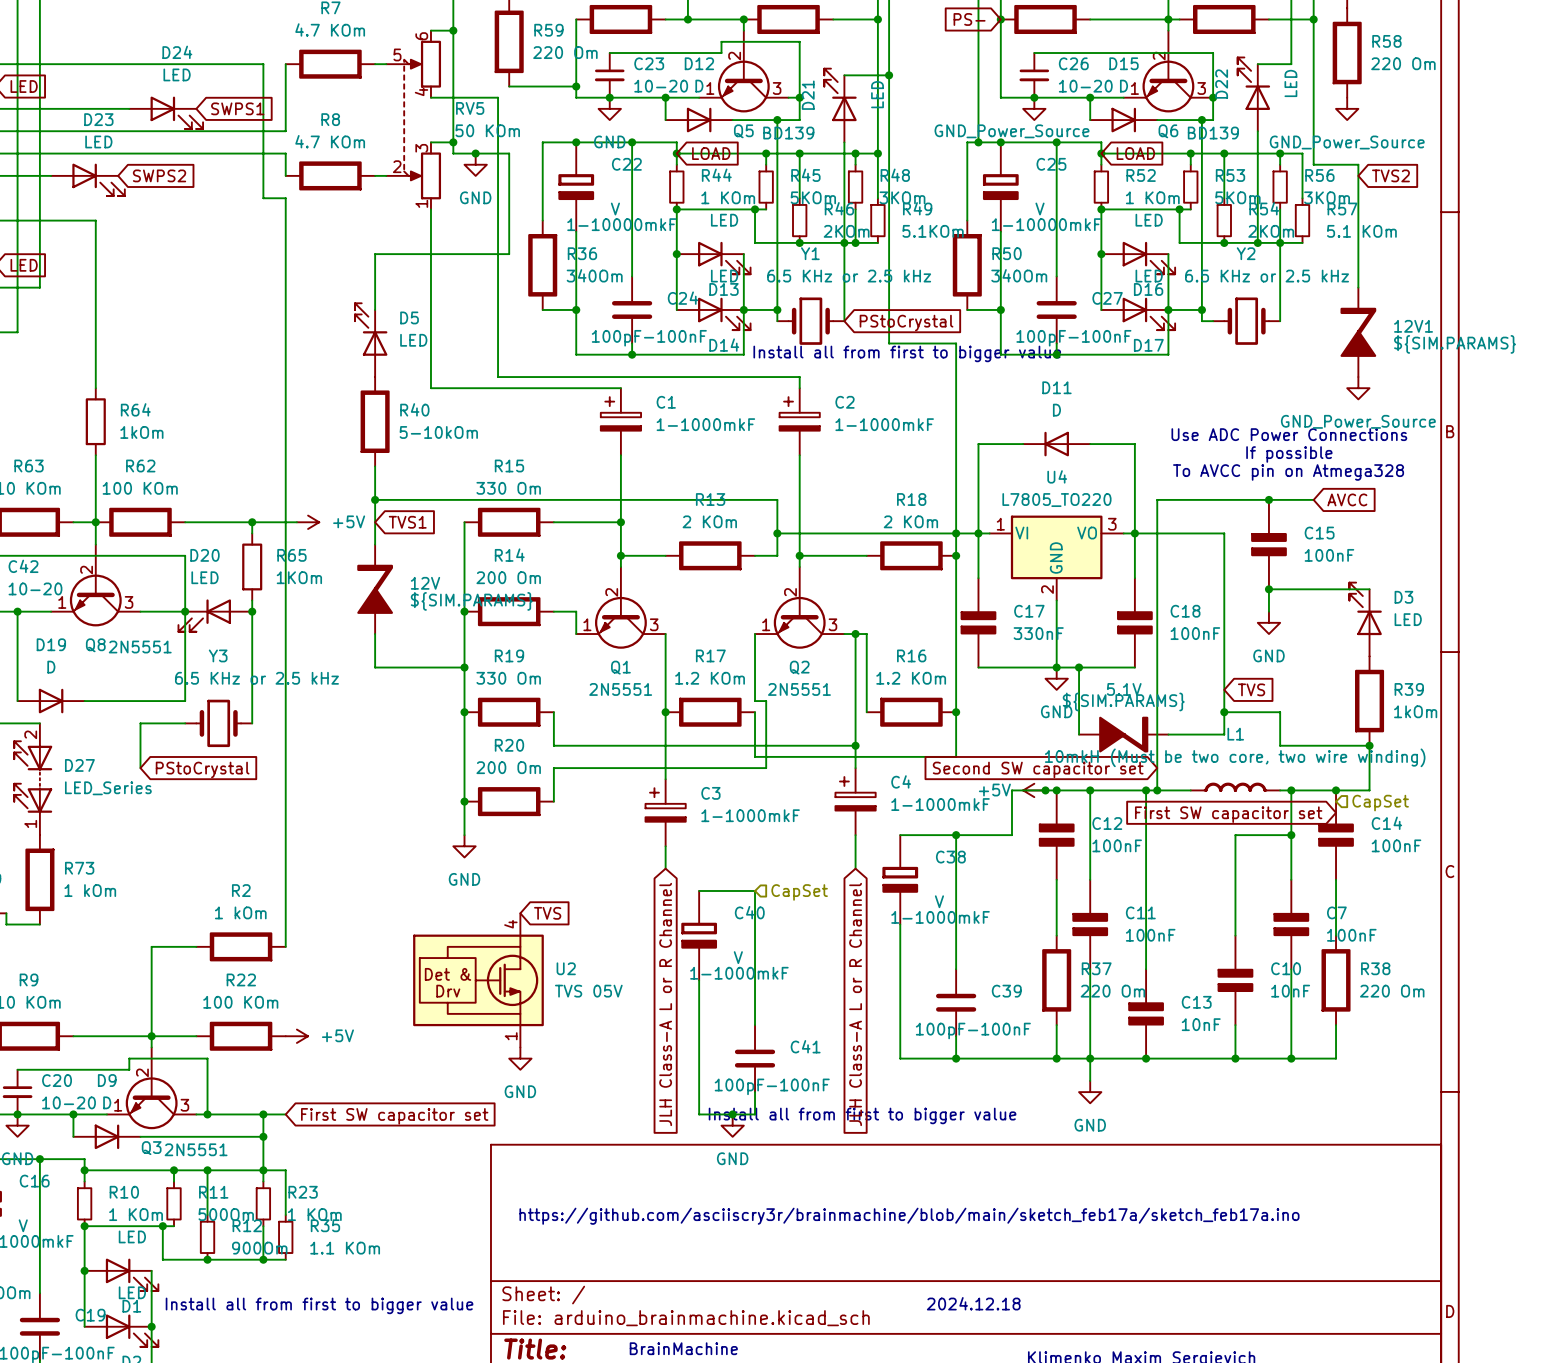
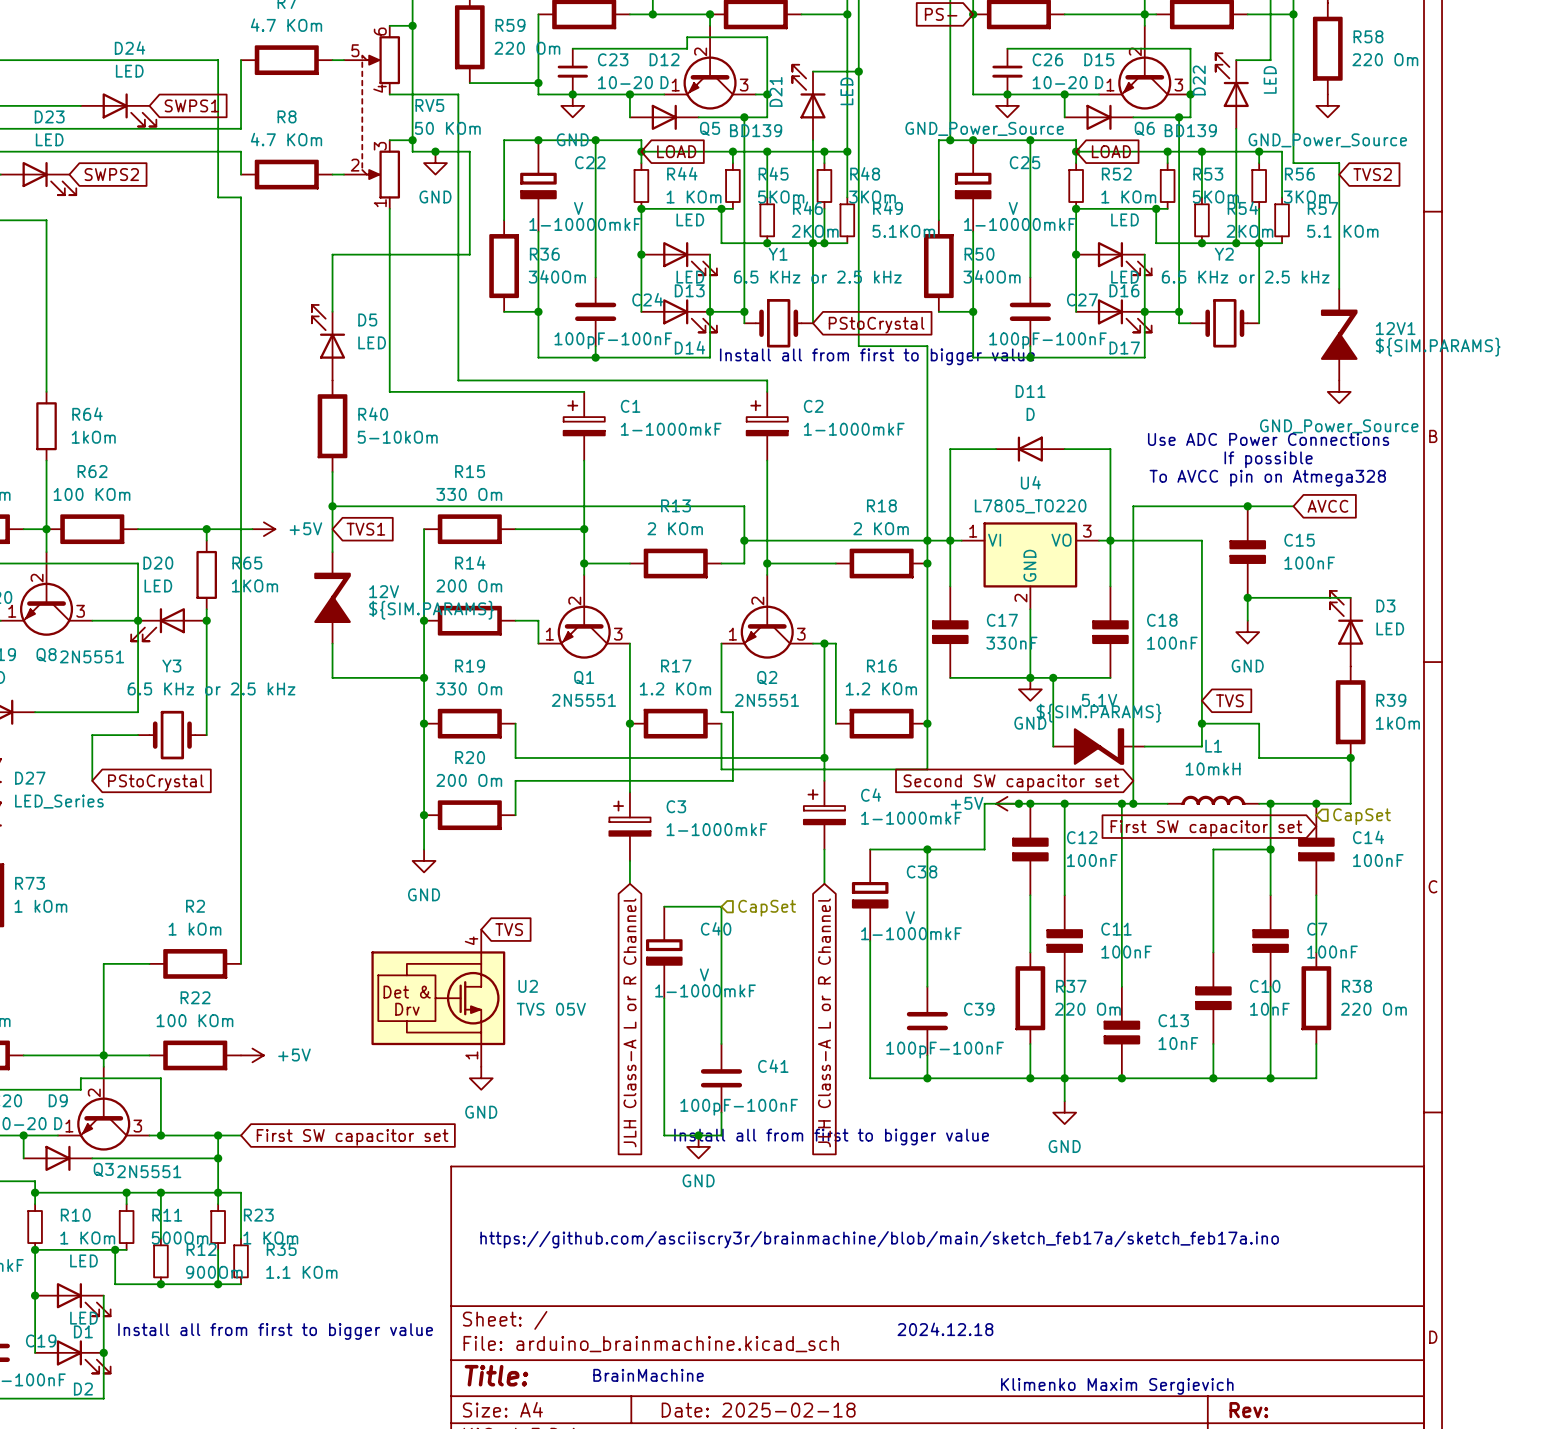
L1 value: 10mkH (Must be two core, two wire winding) (1235, 757) -> 10mkH (1213, 769)

